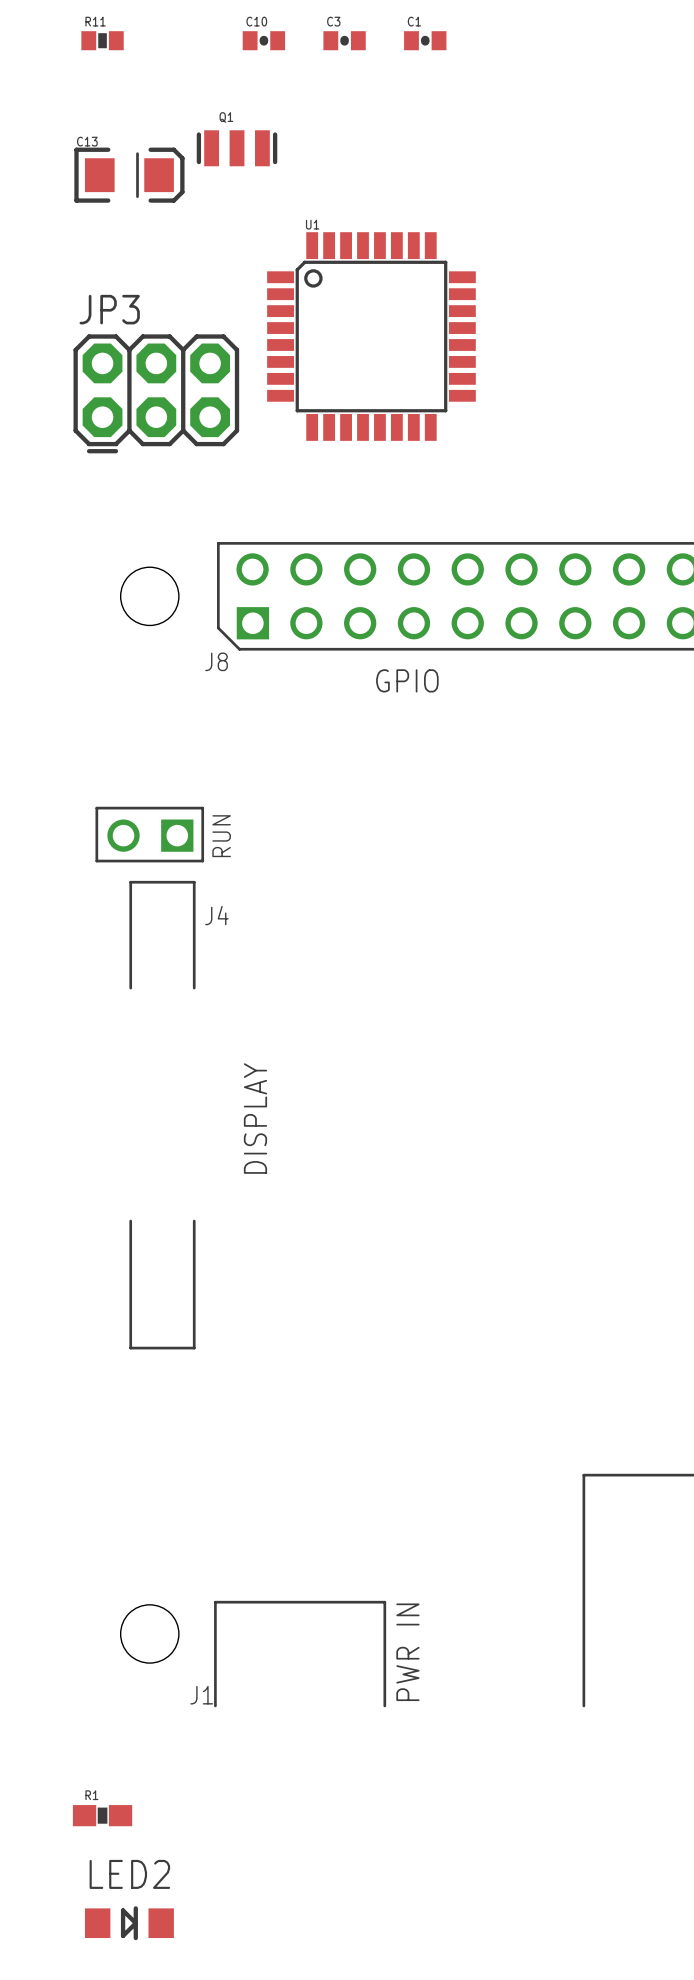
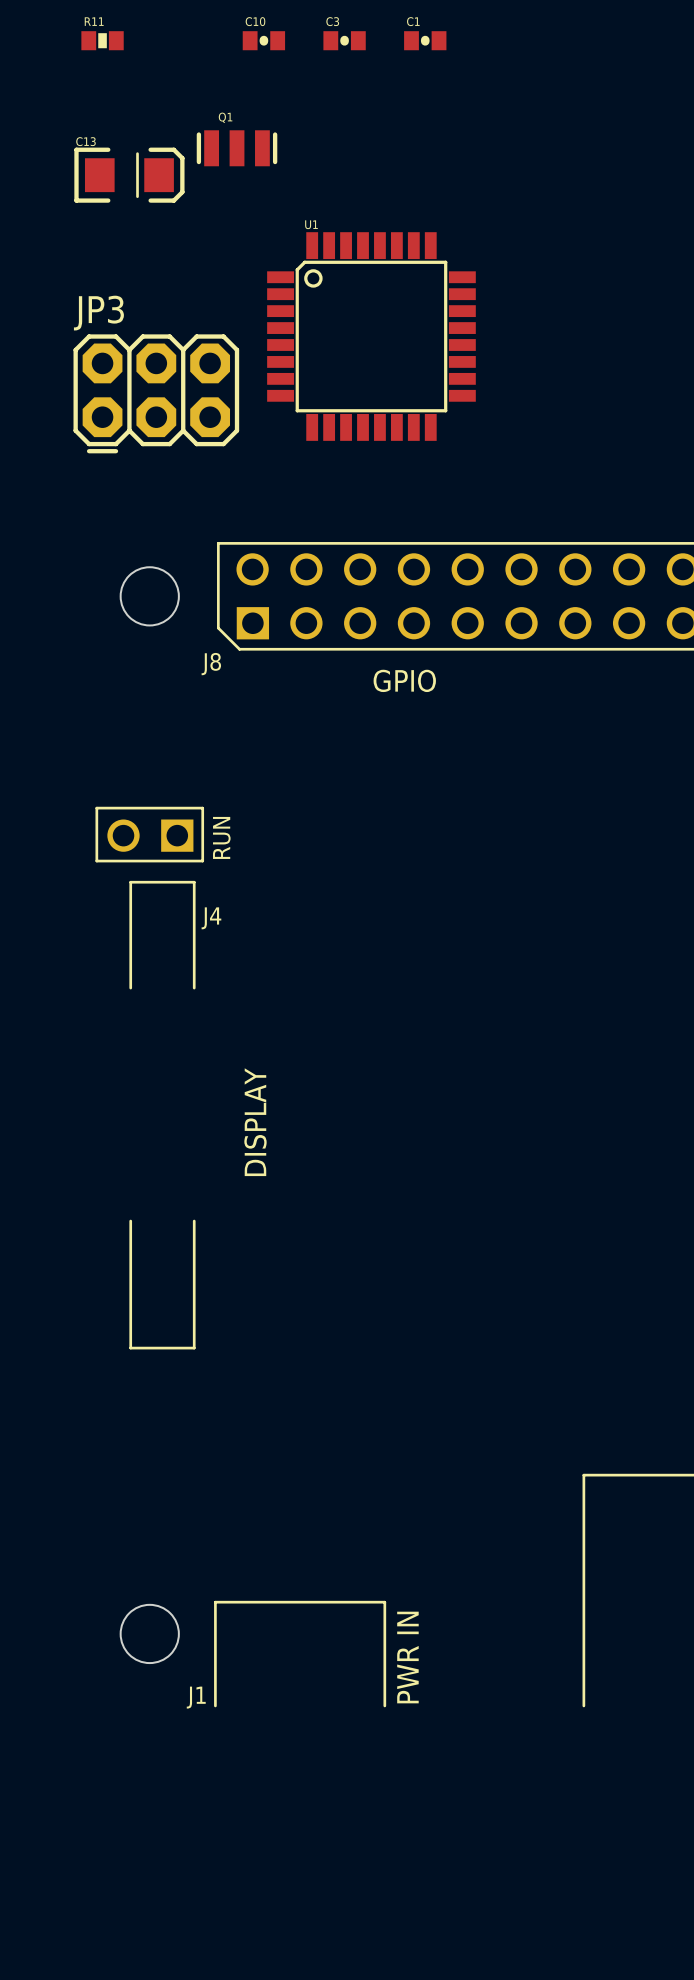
R1: (102, 1815) -> none
LED2: (129, 1923) -> none

